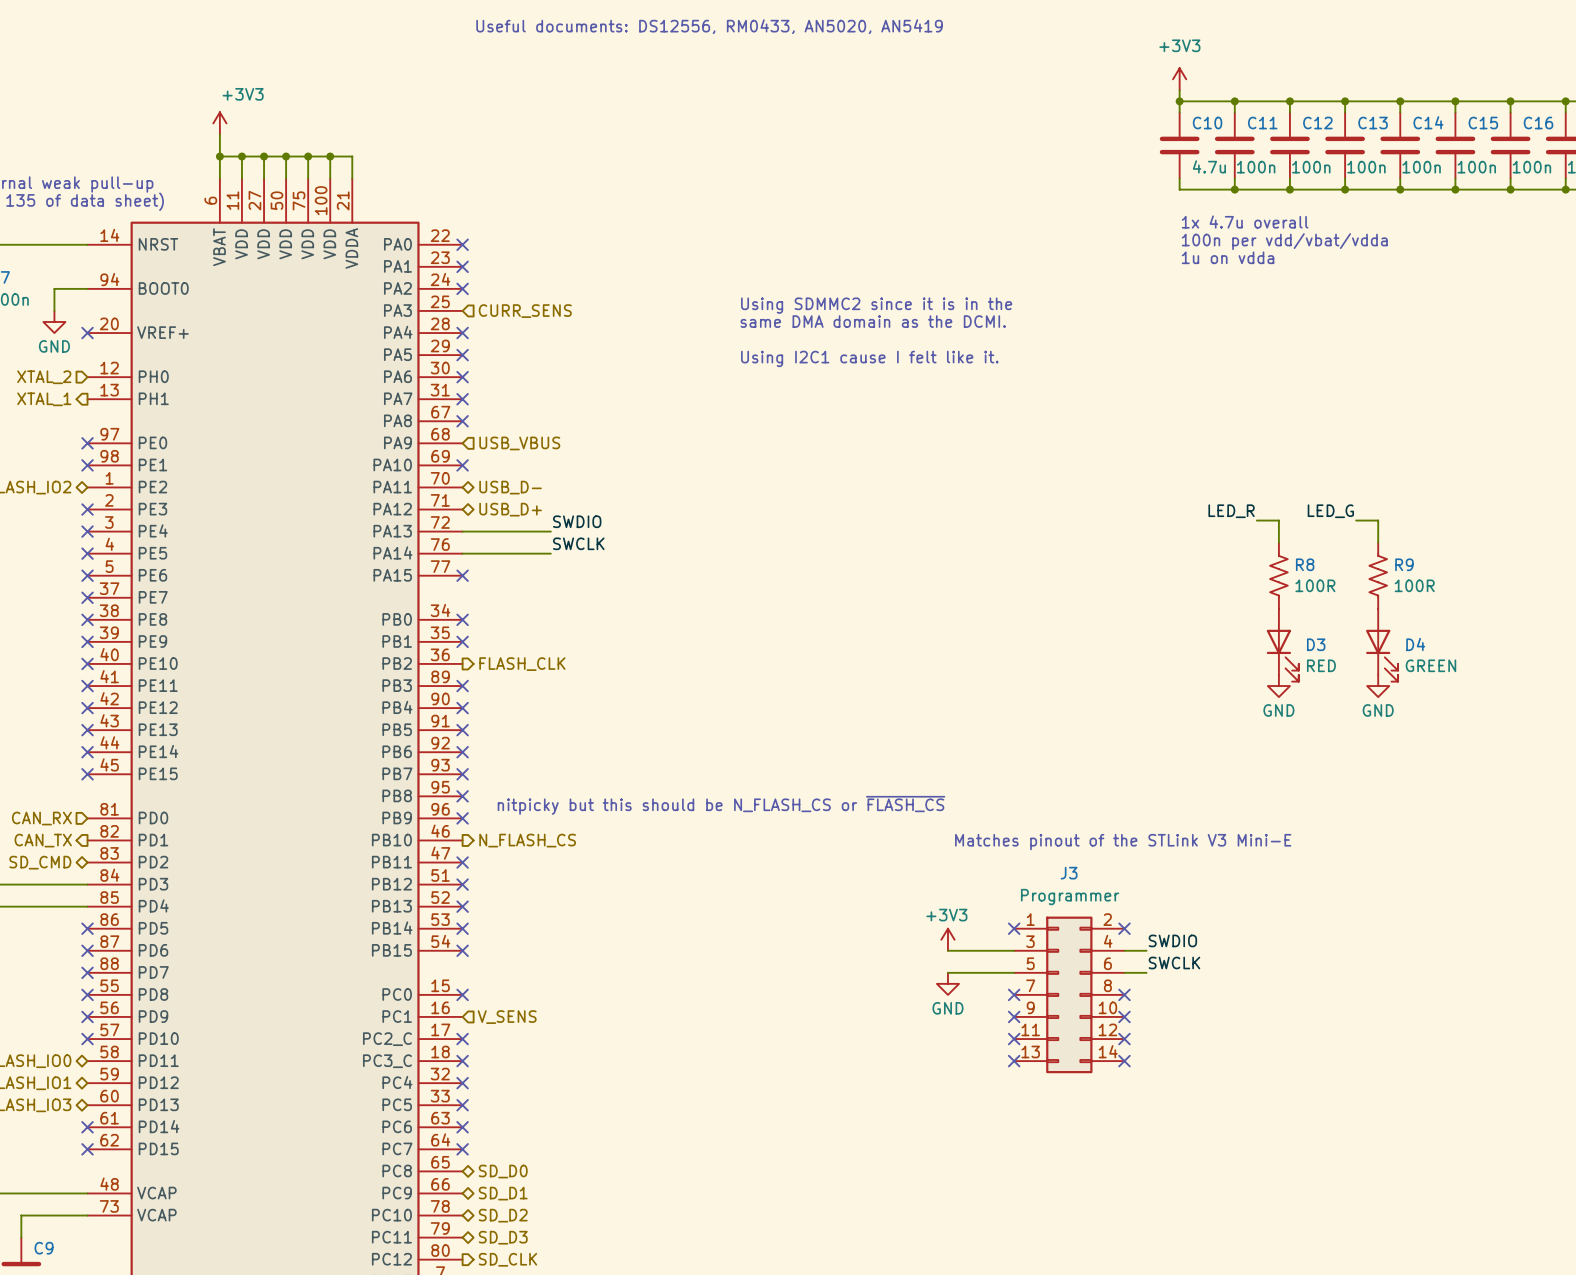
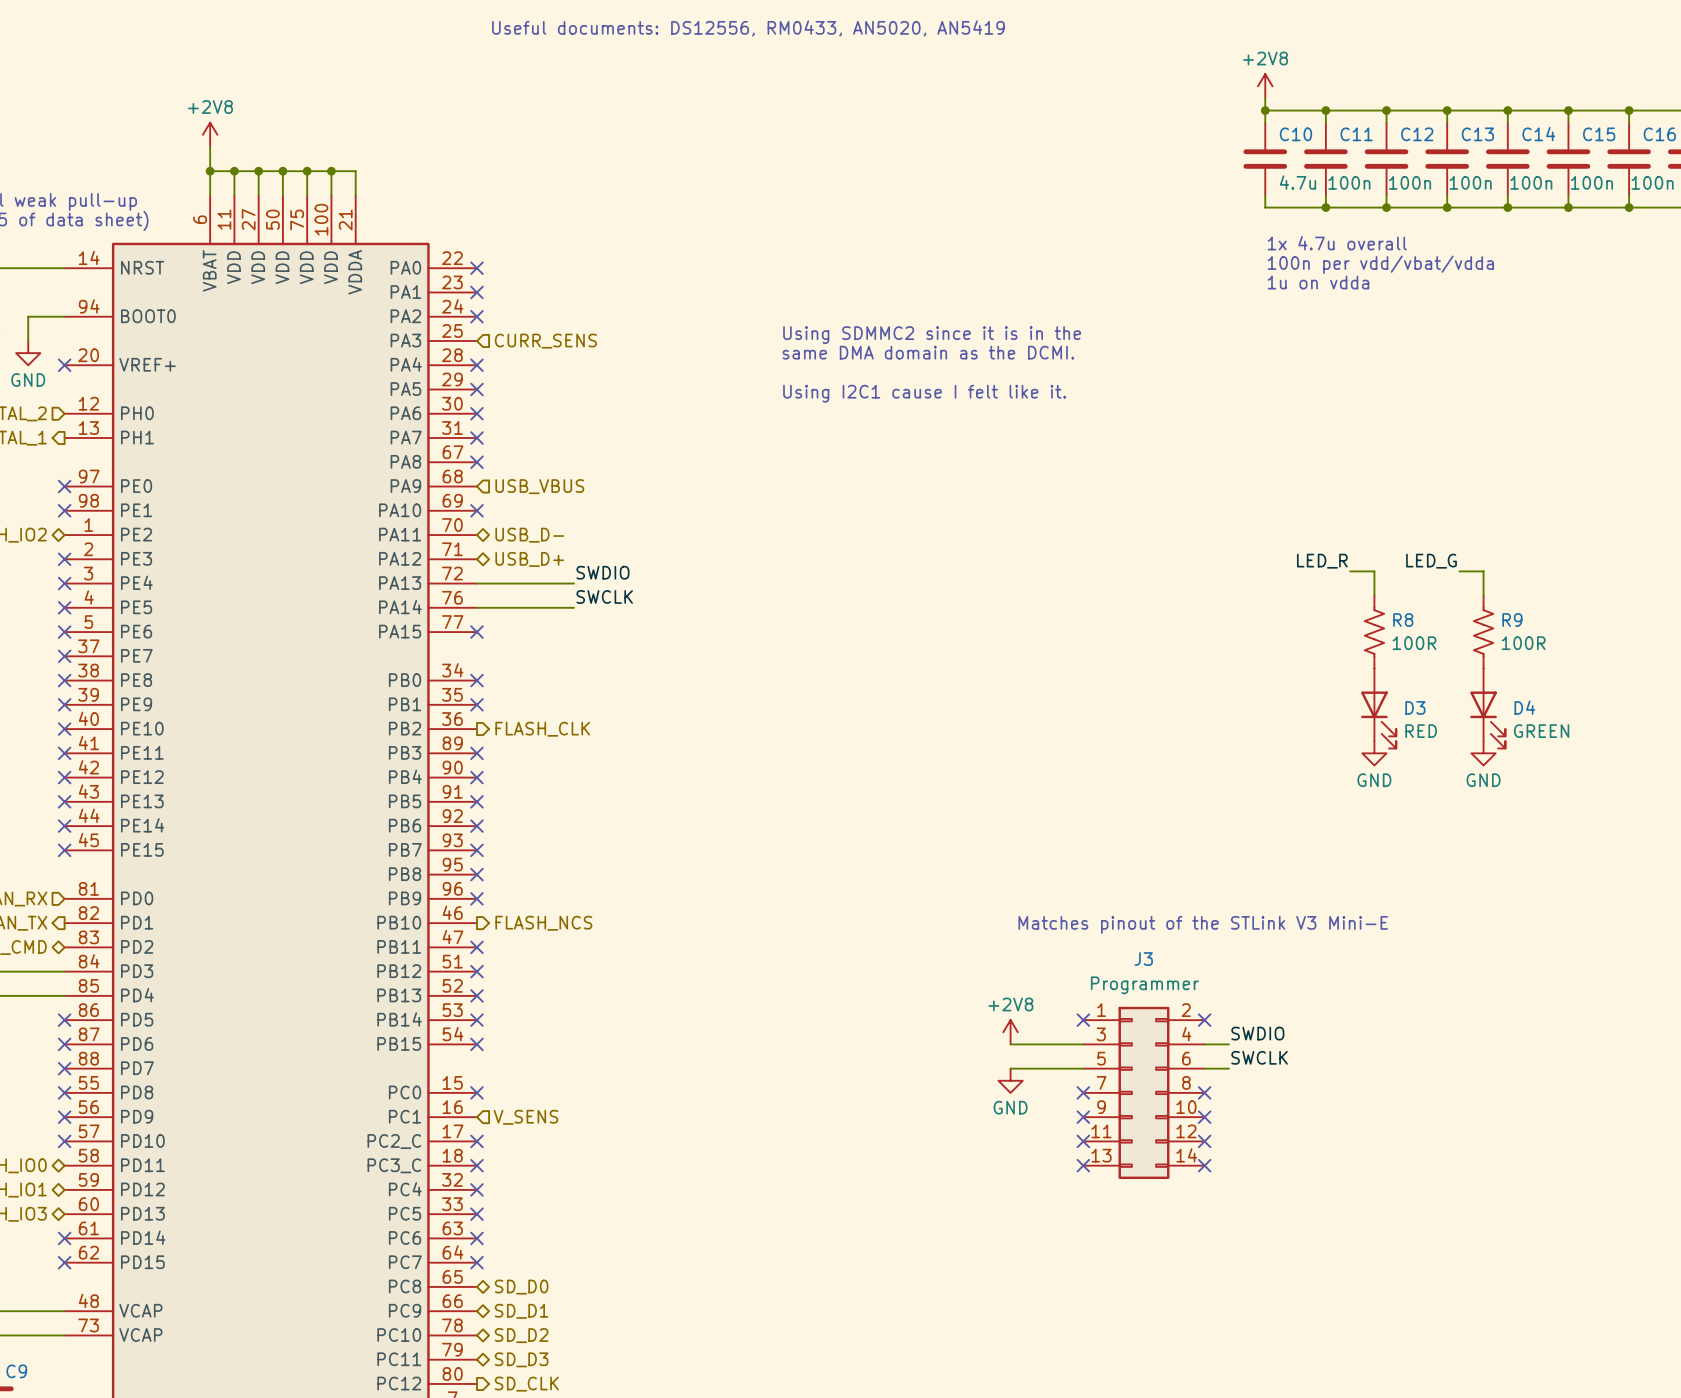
power symbol: +3V3 (1179, 79) -> +2V8 (1265, 86)
power symbol: +3V3 (219, 123) -> +2V8 (210, 134)
text: nitpicky but this should be N_FLASH_CS or ~{FLASH_CS} (721, 805) -> none
hierarchical label: N_FLASH_CS (527, 840) -> FLASH_NCS (543, 923)
power symbol: +3V3 (947, 939) -> +2V8 (1010, 1032)

